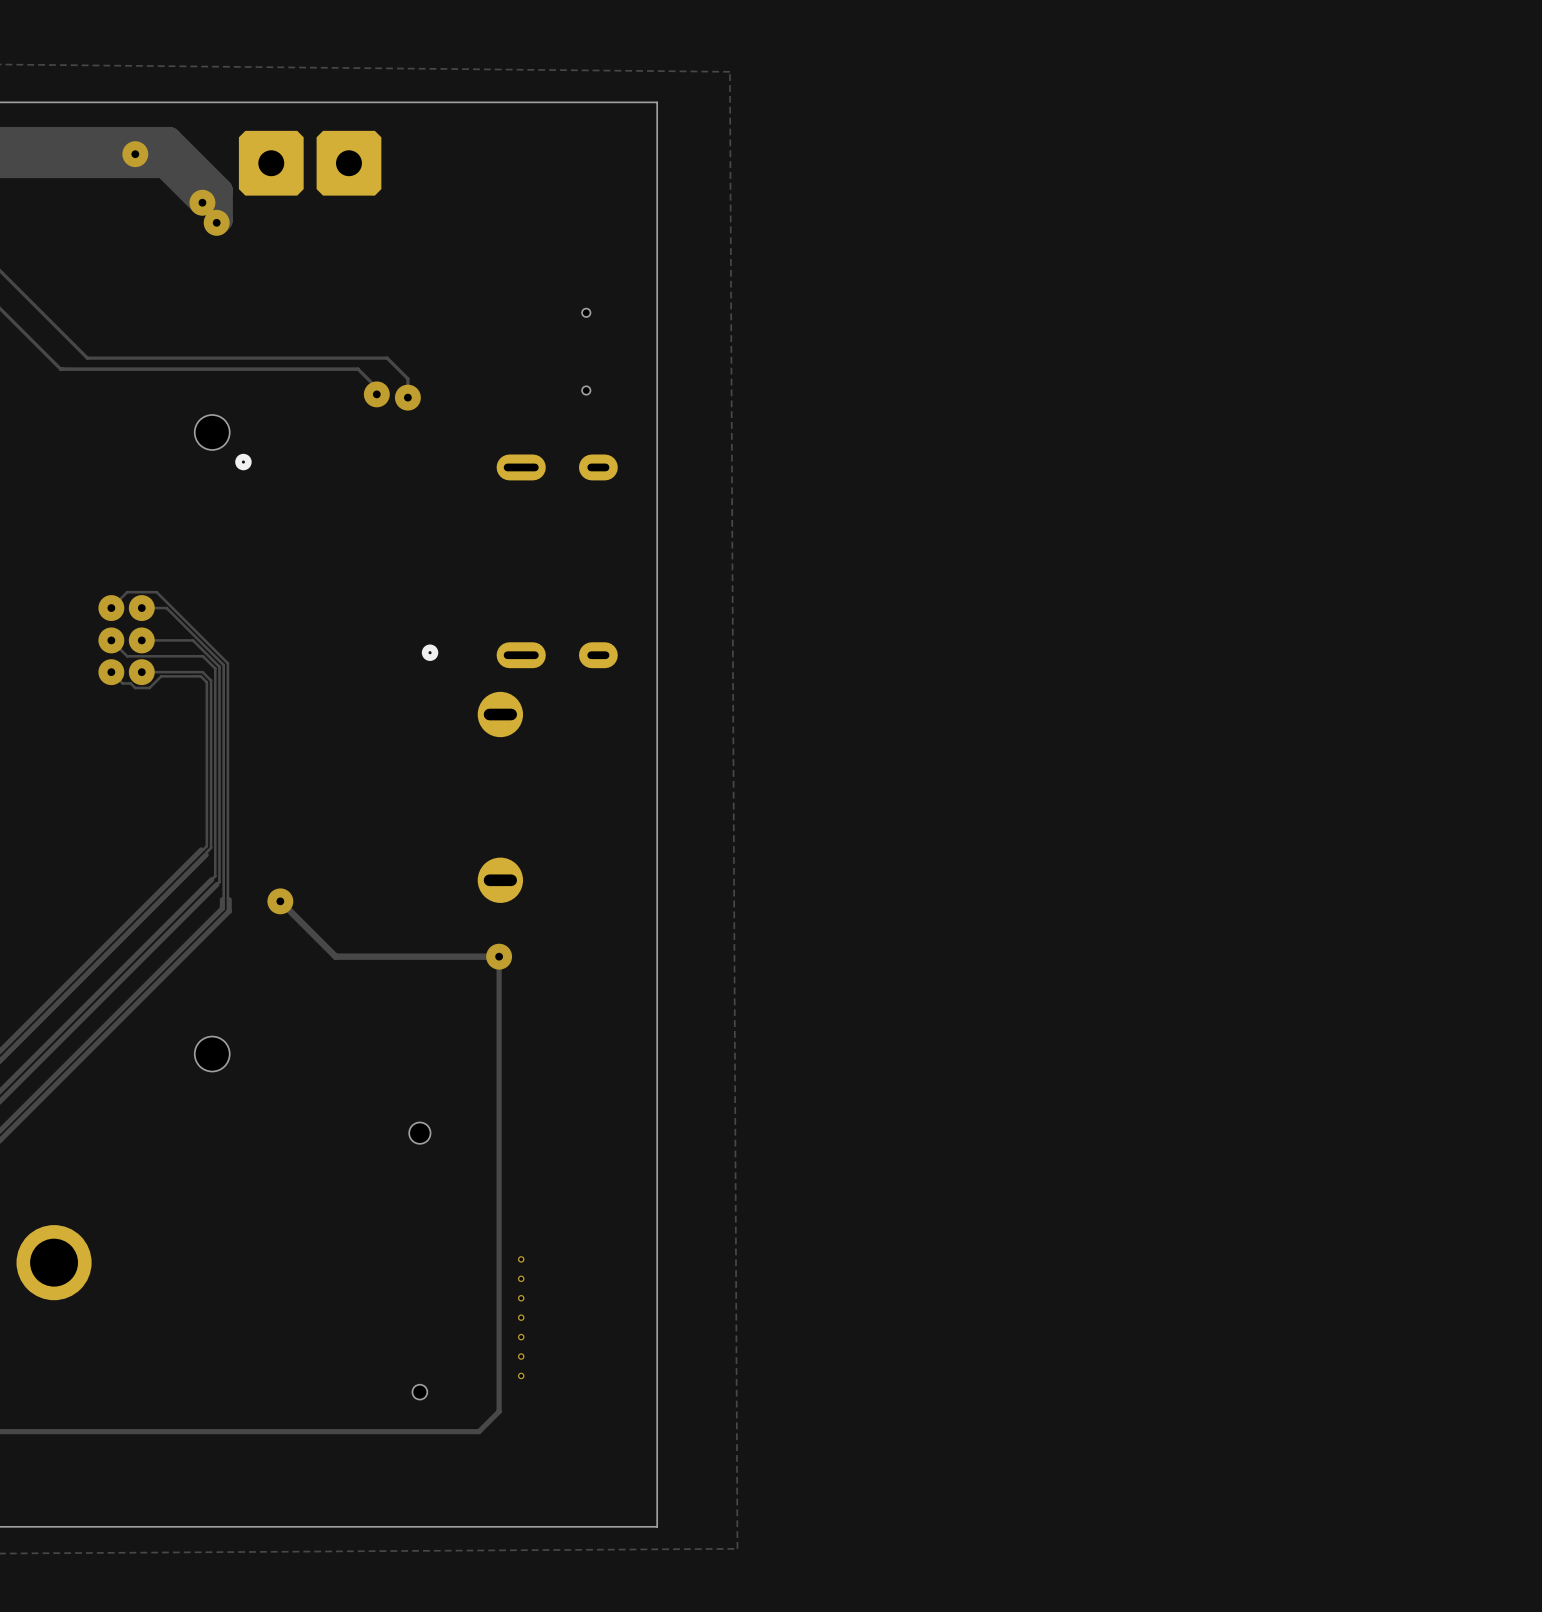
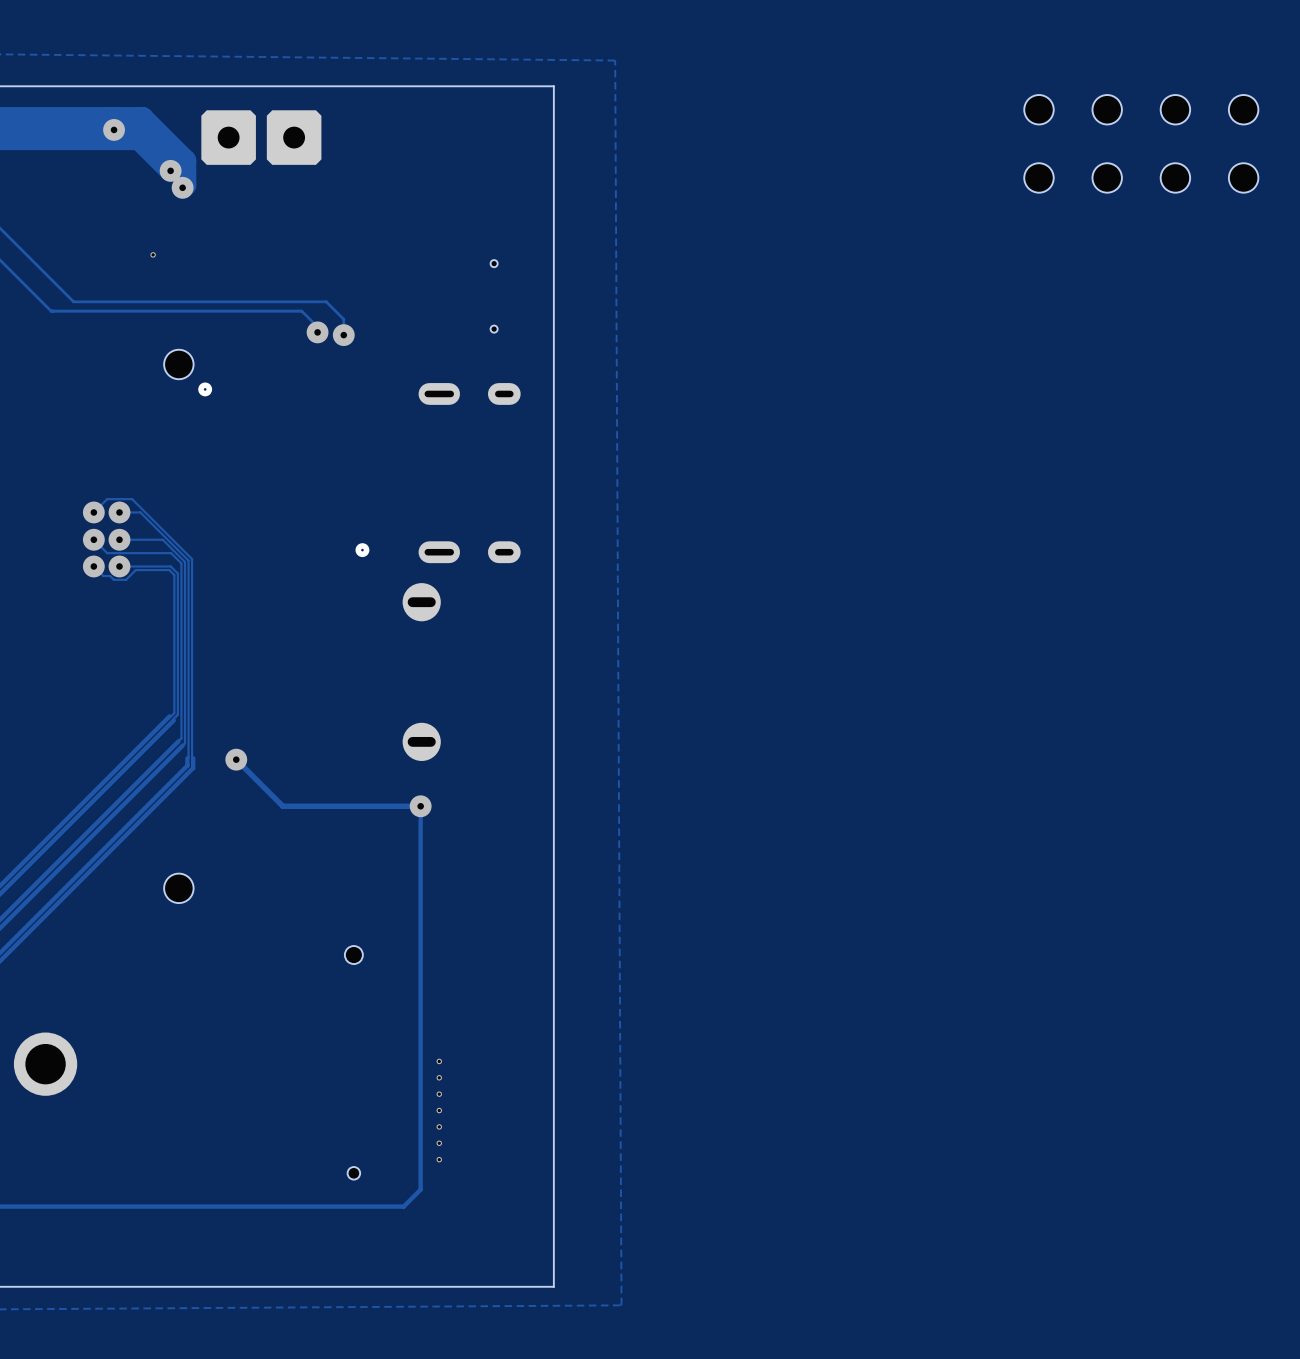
part: none -> (1038, 109)
part: none -> (1107, 109)
part: none -> (1175, 109)
part: none -> (1243, 109)
part: none -> (1038, 177)
part: none -> (1107, 177)
part: none -> (1175, 177)
part: none -> (1243, 177)
via: none -> (153, 254)

